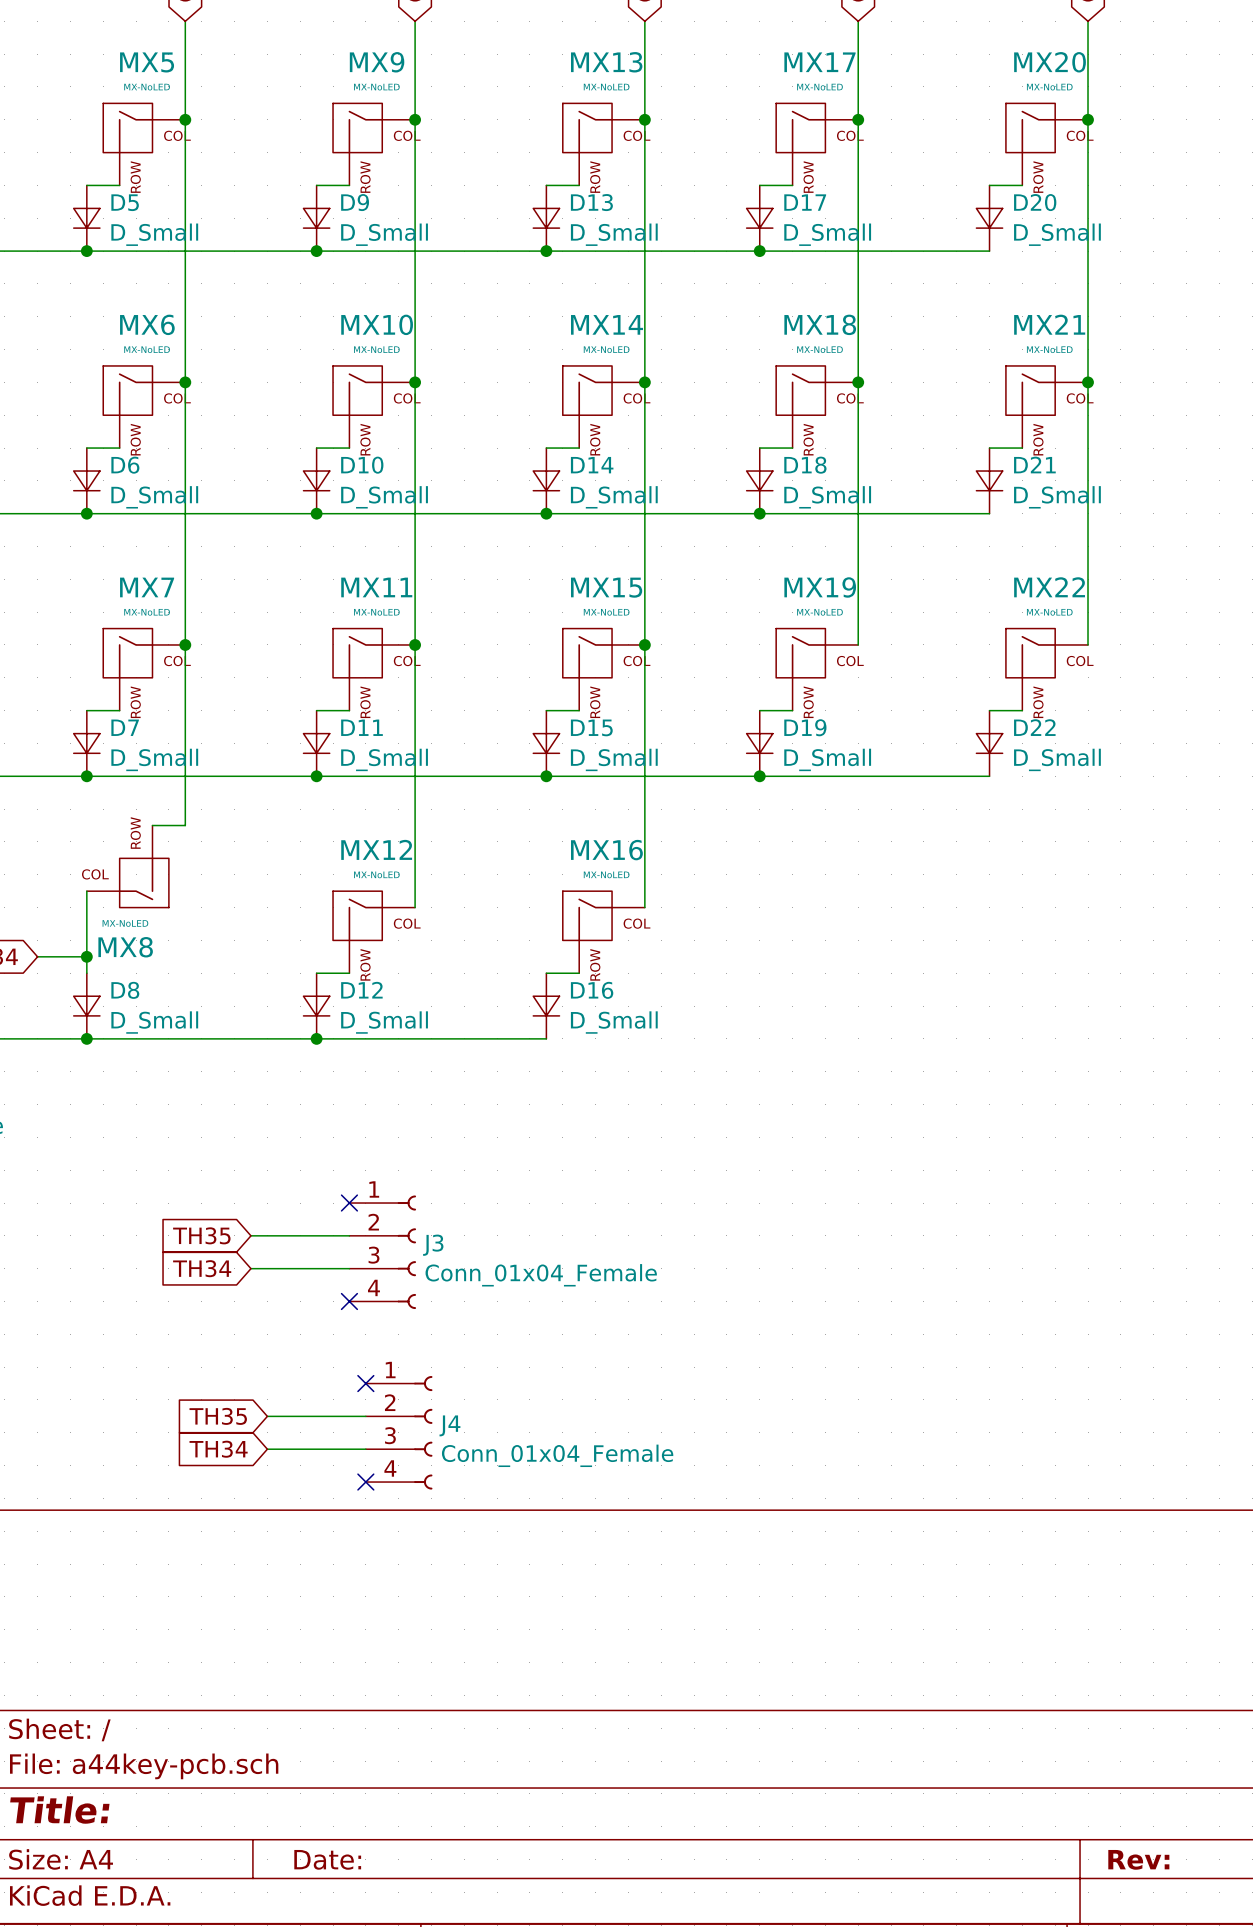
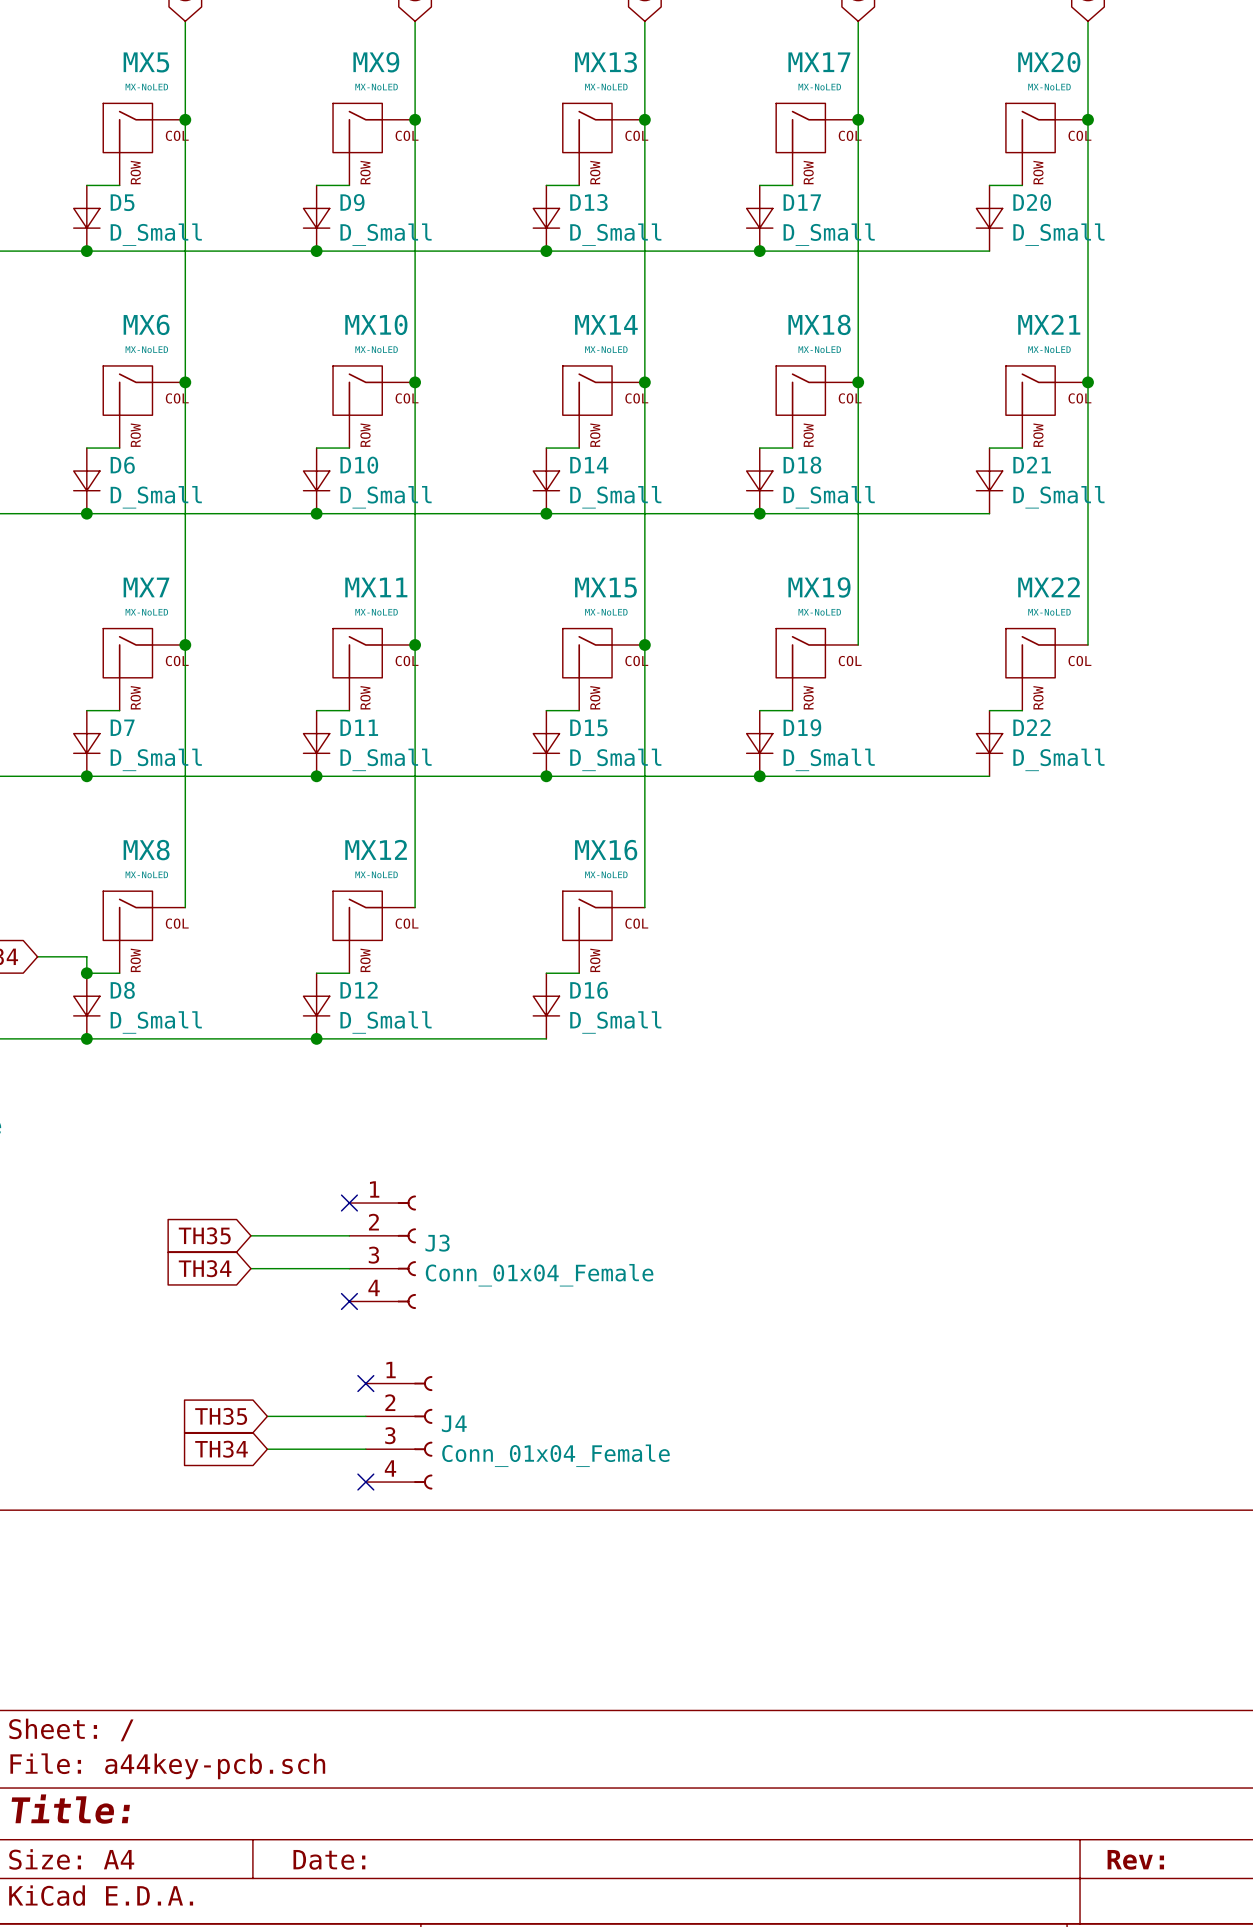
wire: (152, 825) (185, 825) -> (185, 907) (185, 825)
MX8 position: (127, 866) -> (144, 932)
MX8 rotation: 0° (143, 882) -> 180° (128, 916)
wire: (86, 891) (86, 956) -> none
junction position: (86, 956) -> (86, 973)
wire: none -> (86, 973) (119, 973)

